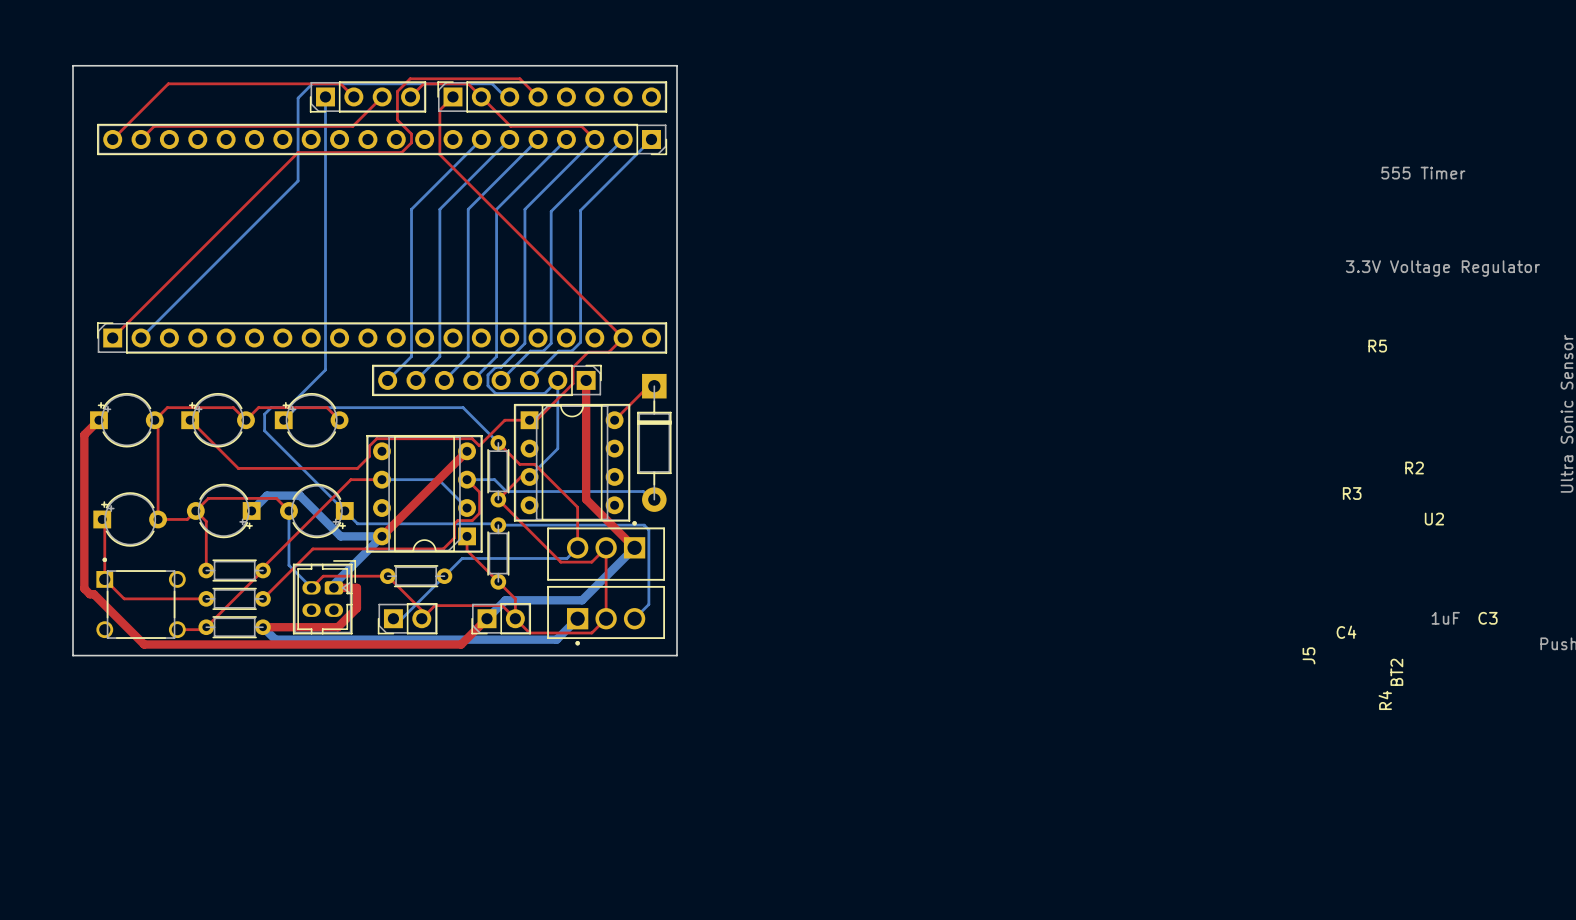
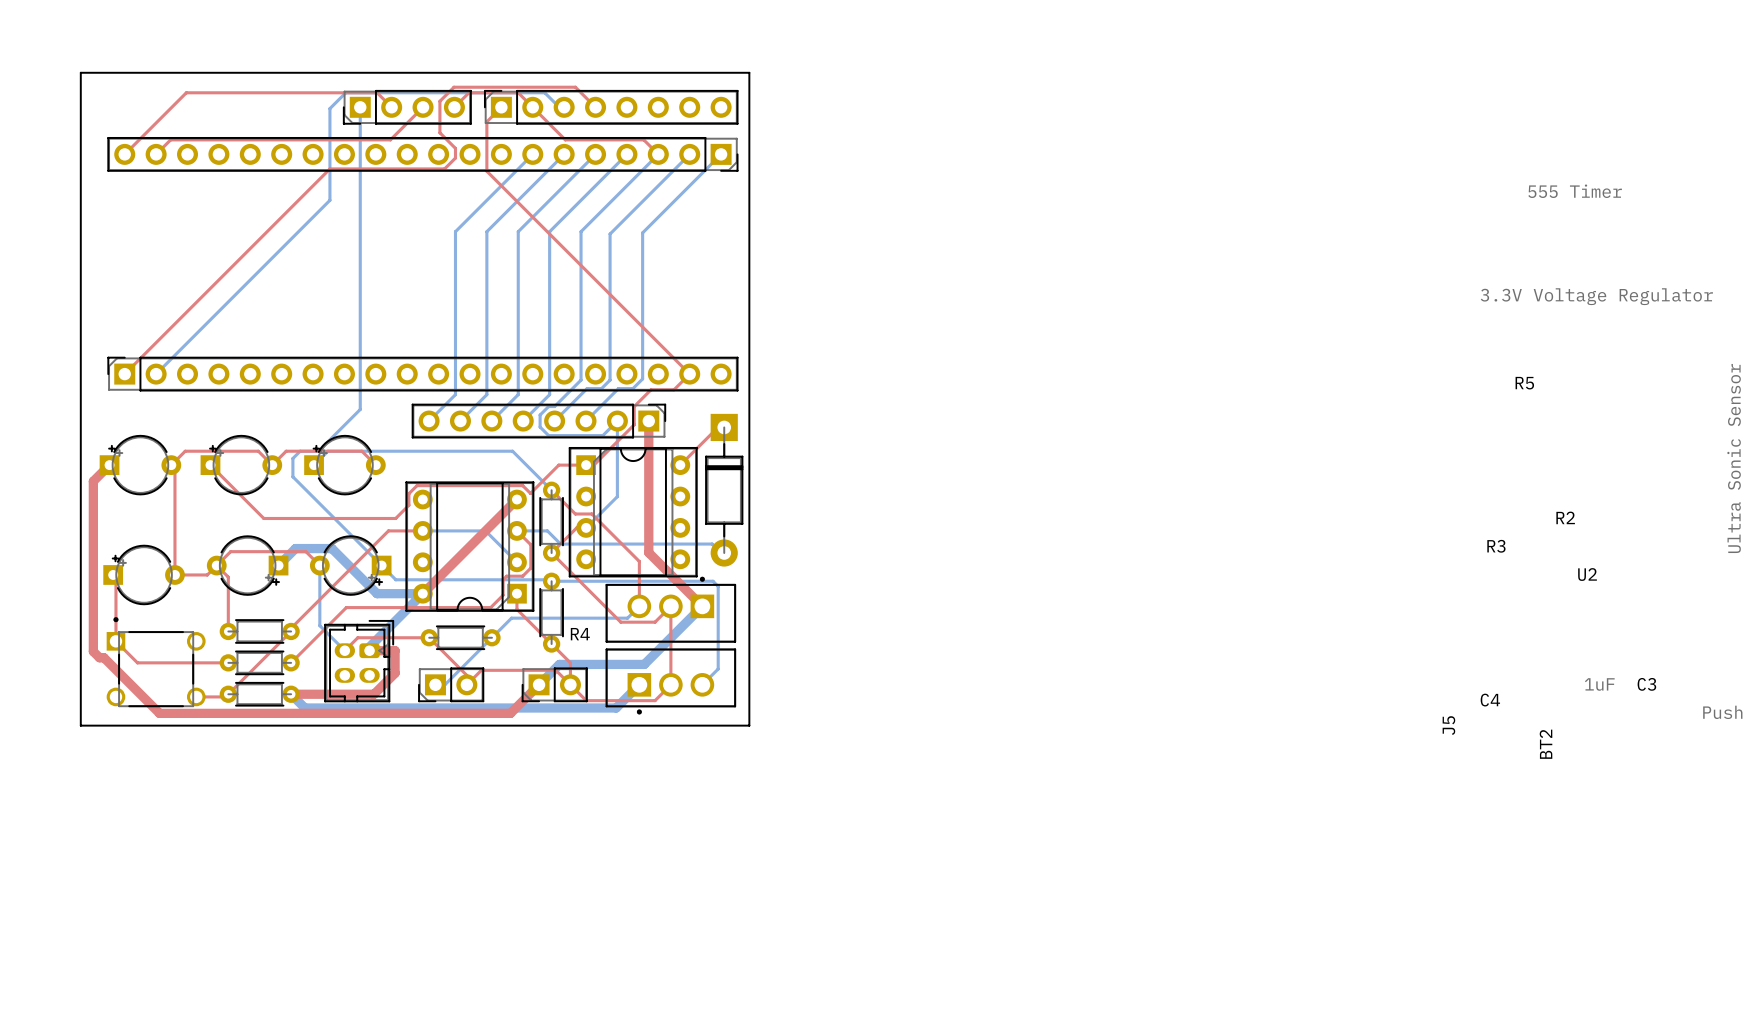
R4 name rotation: 0° (1385, 700) -> 90° clockwise (580, 634)
R4 name position: R4 (1385, 700) -> R4 (580, 634)

